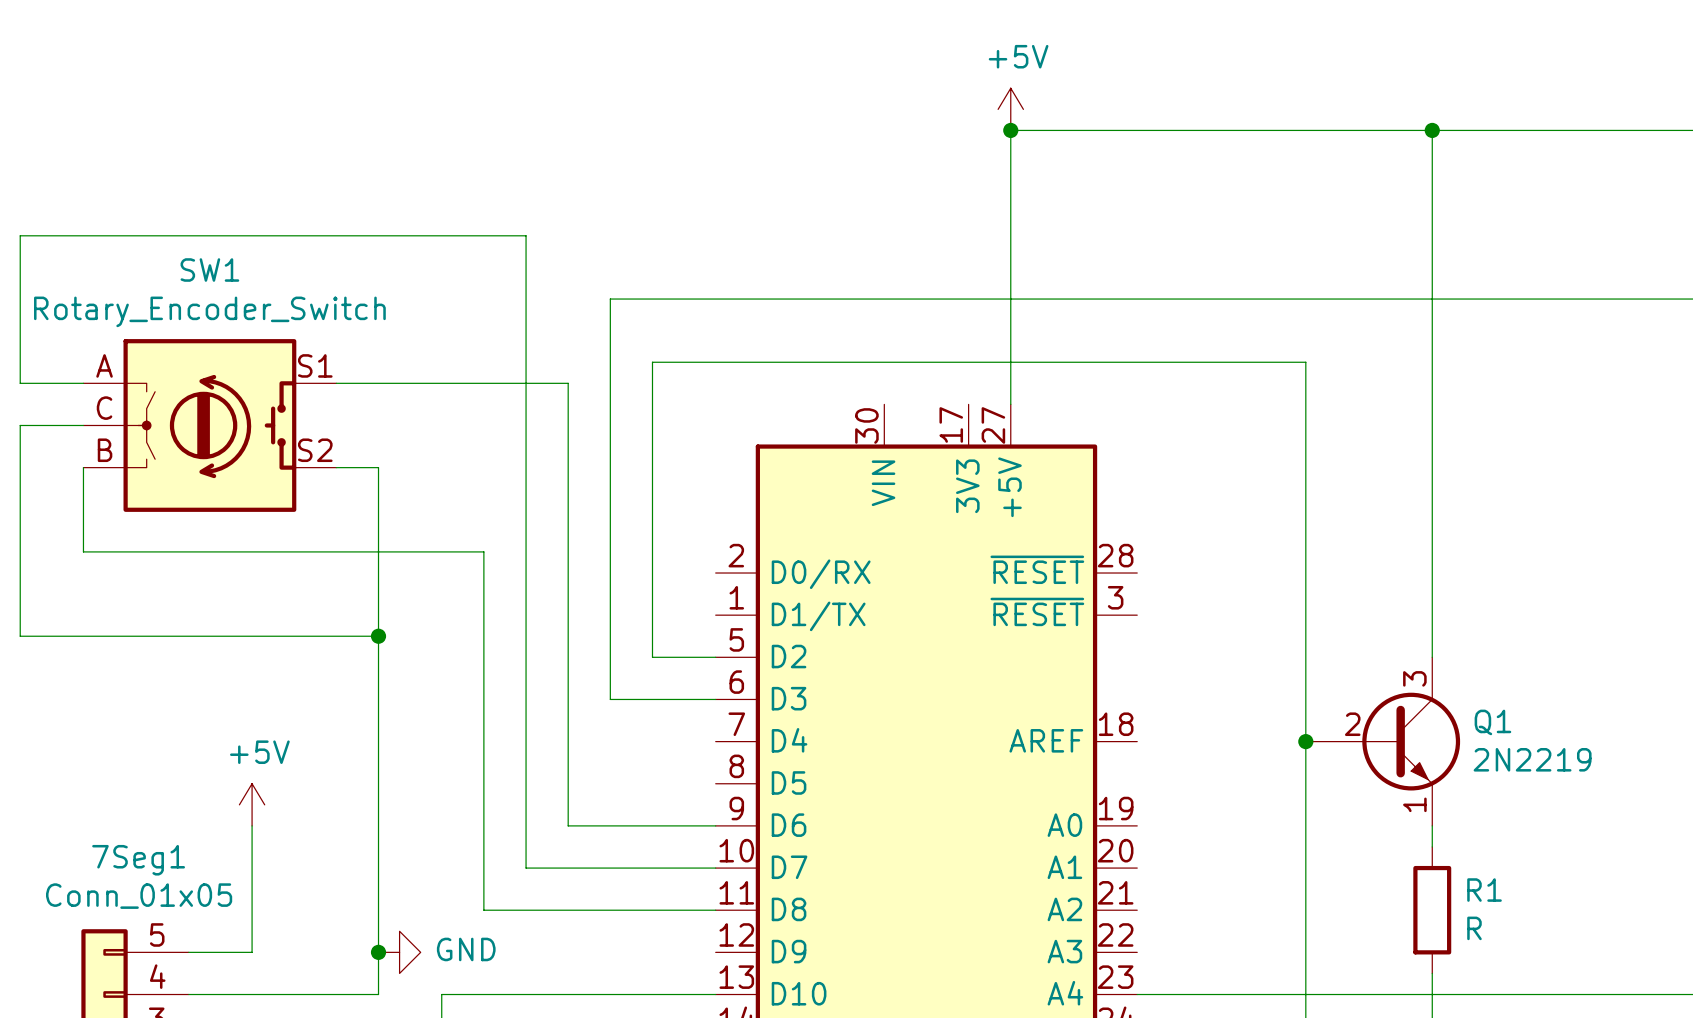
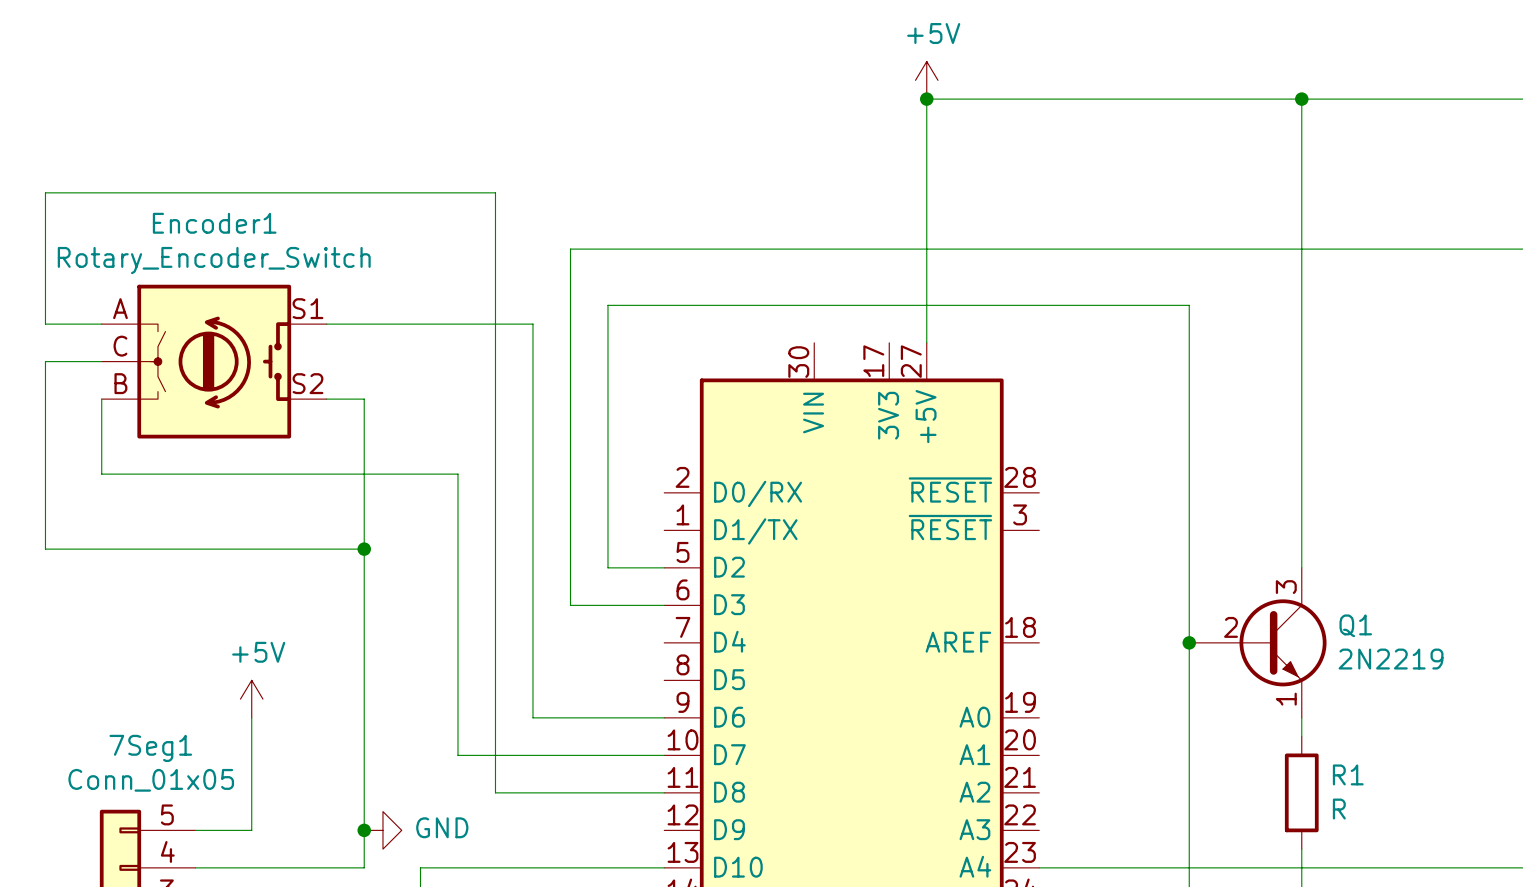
SW1 name: SW1 (209, 270) -> Encoder1 (214, 223)
wire: (483, 868) (483, 910) (526, 910) -> (457, 755) (495, 755) (495, 792)

